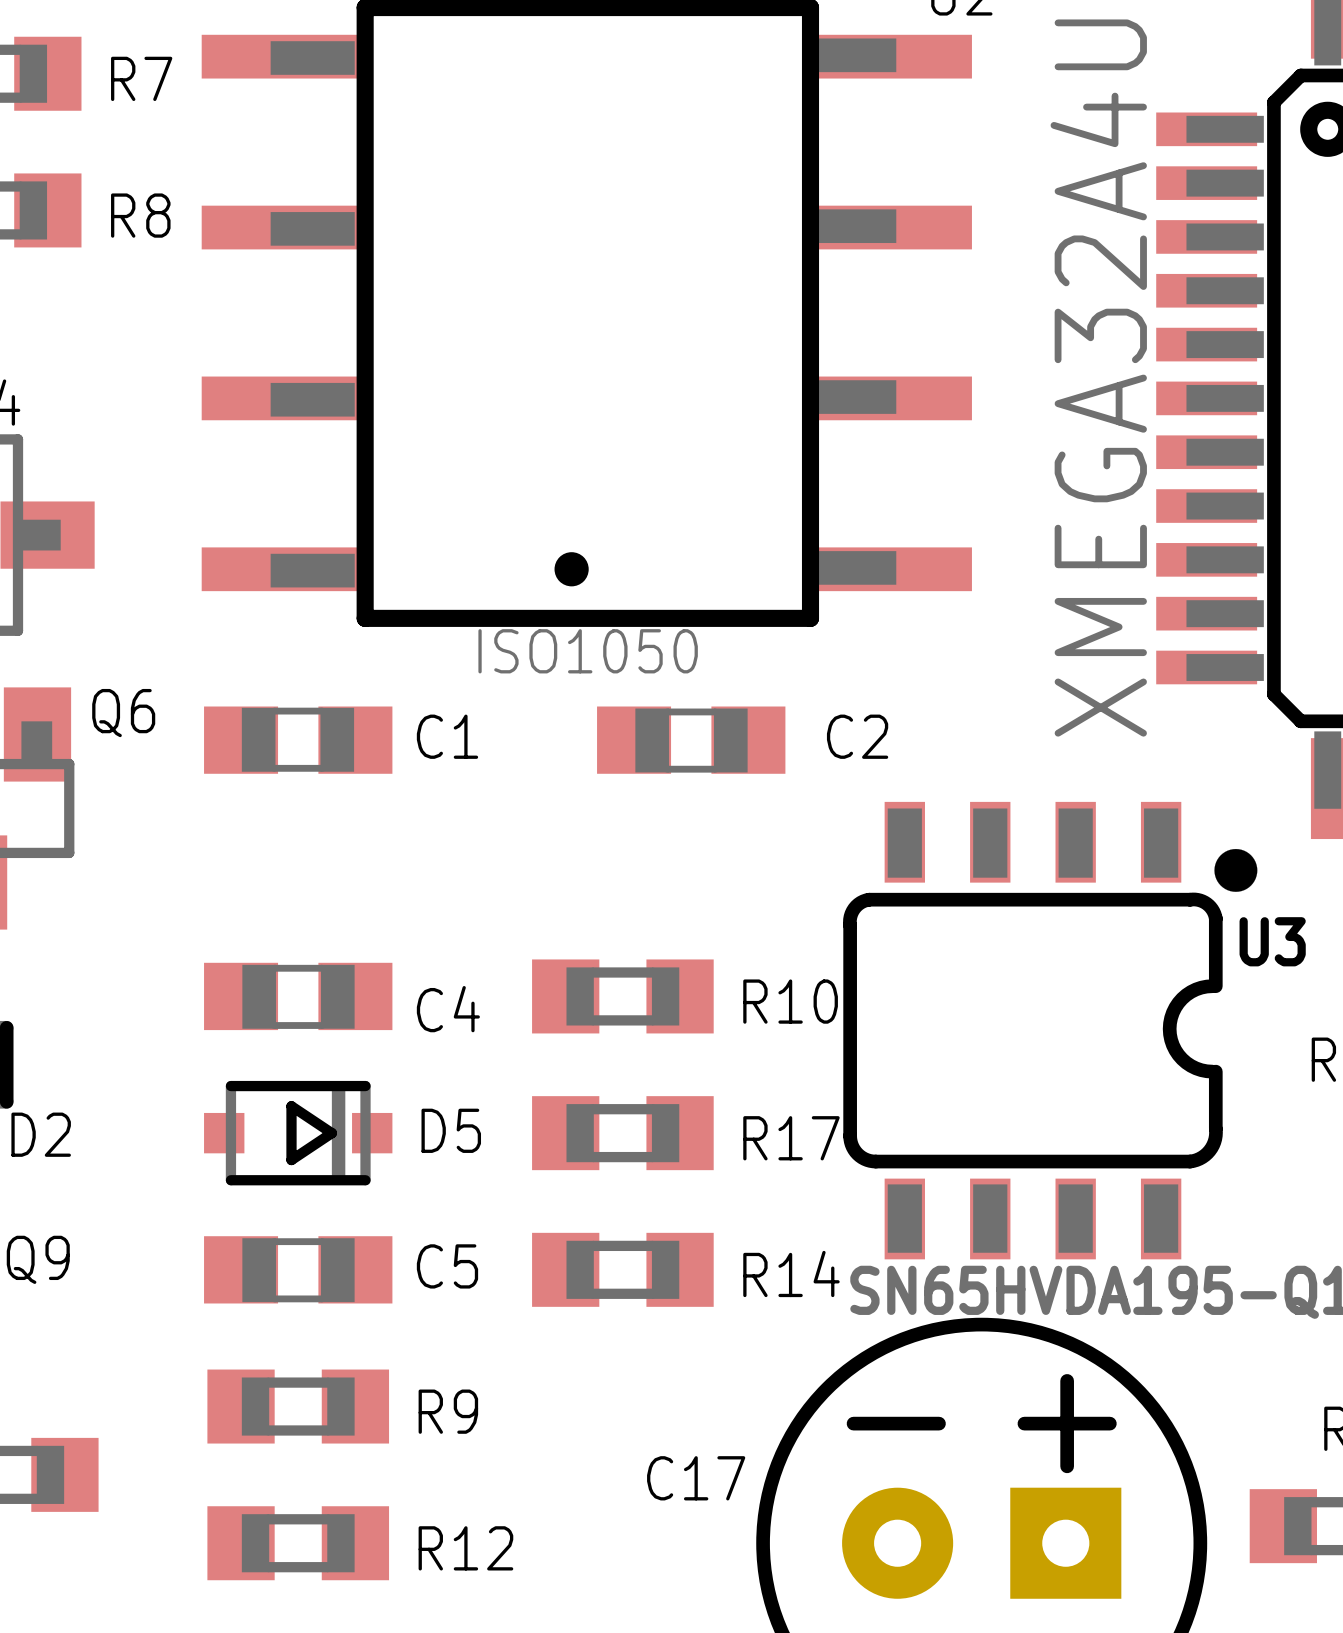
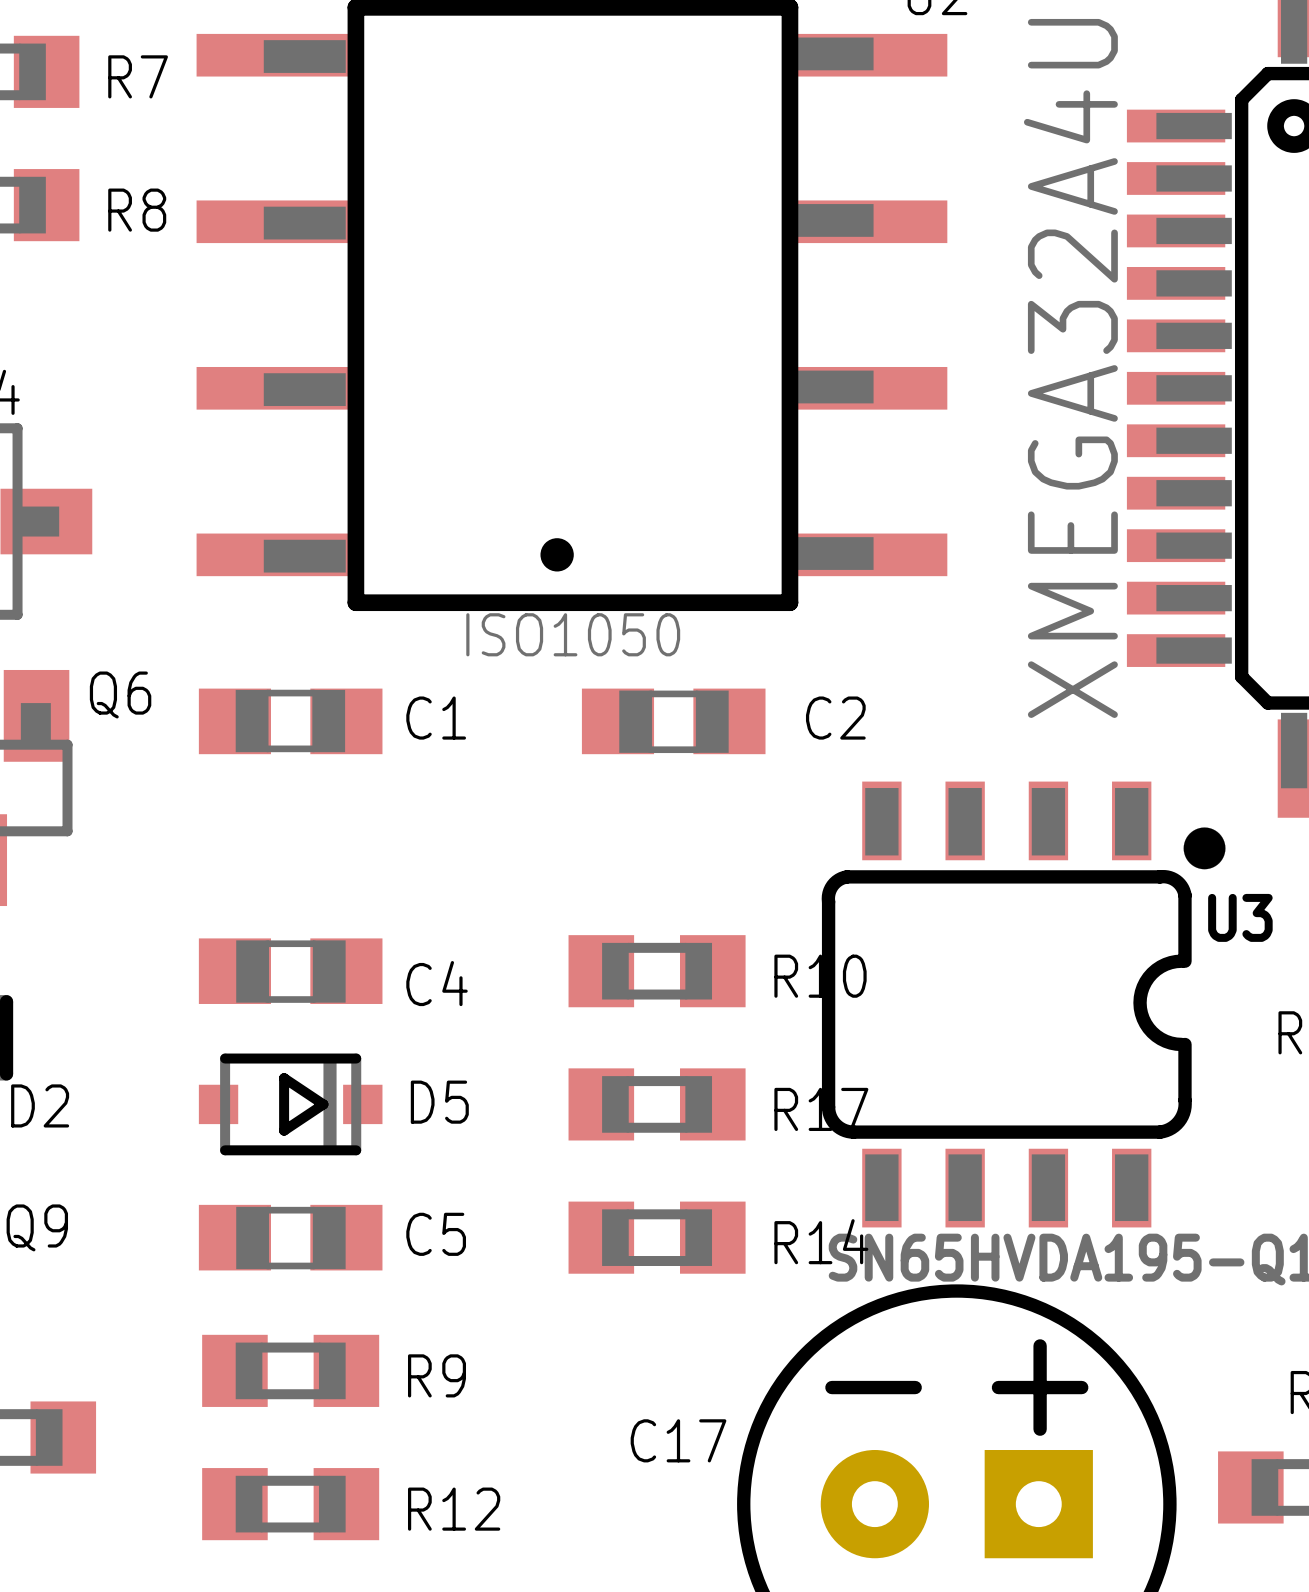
R10 position: (622, 996) -> (657, 971)
R17 position: (622, 1133) -> (657, 1104)
R14 position: (622, 1269) -> (657, 1237)

